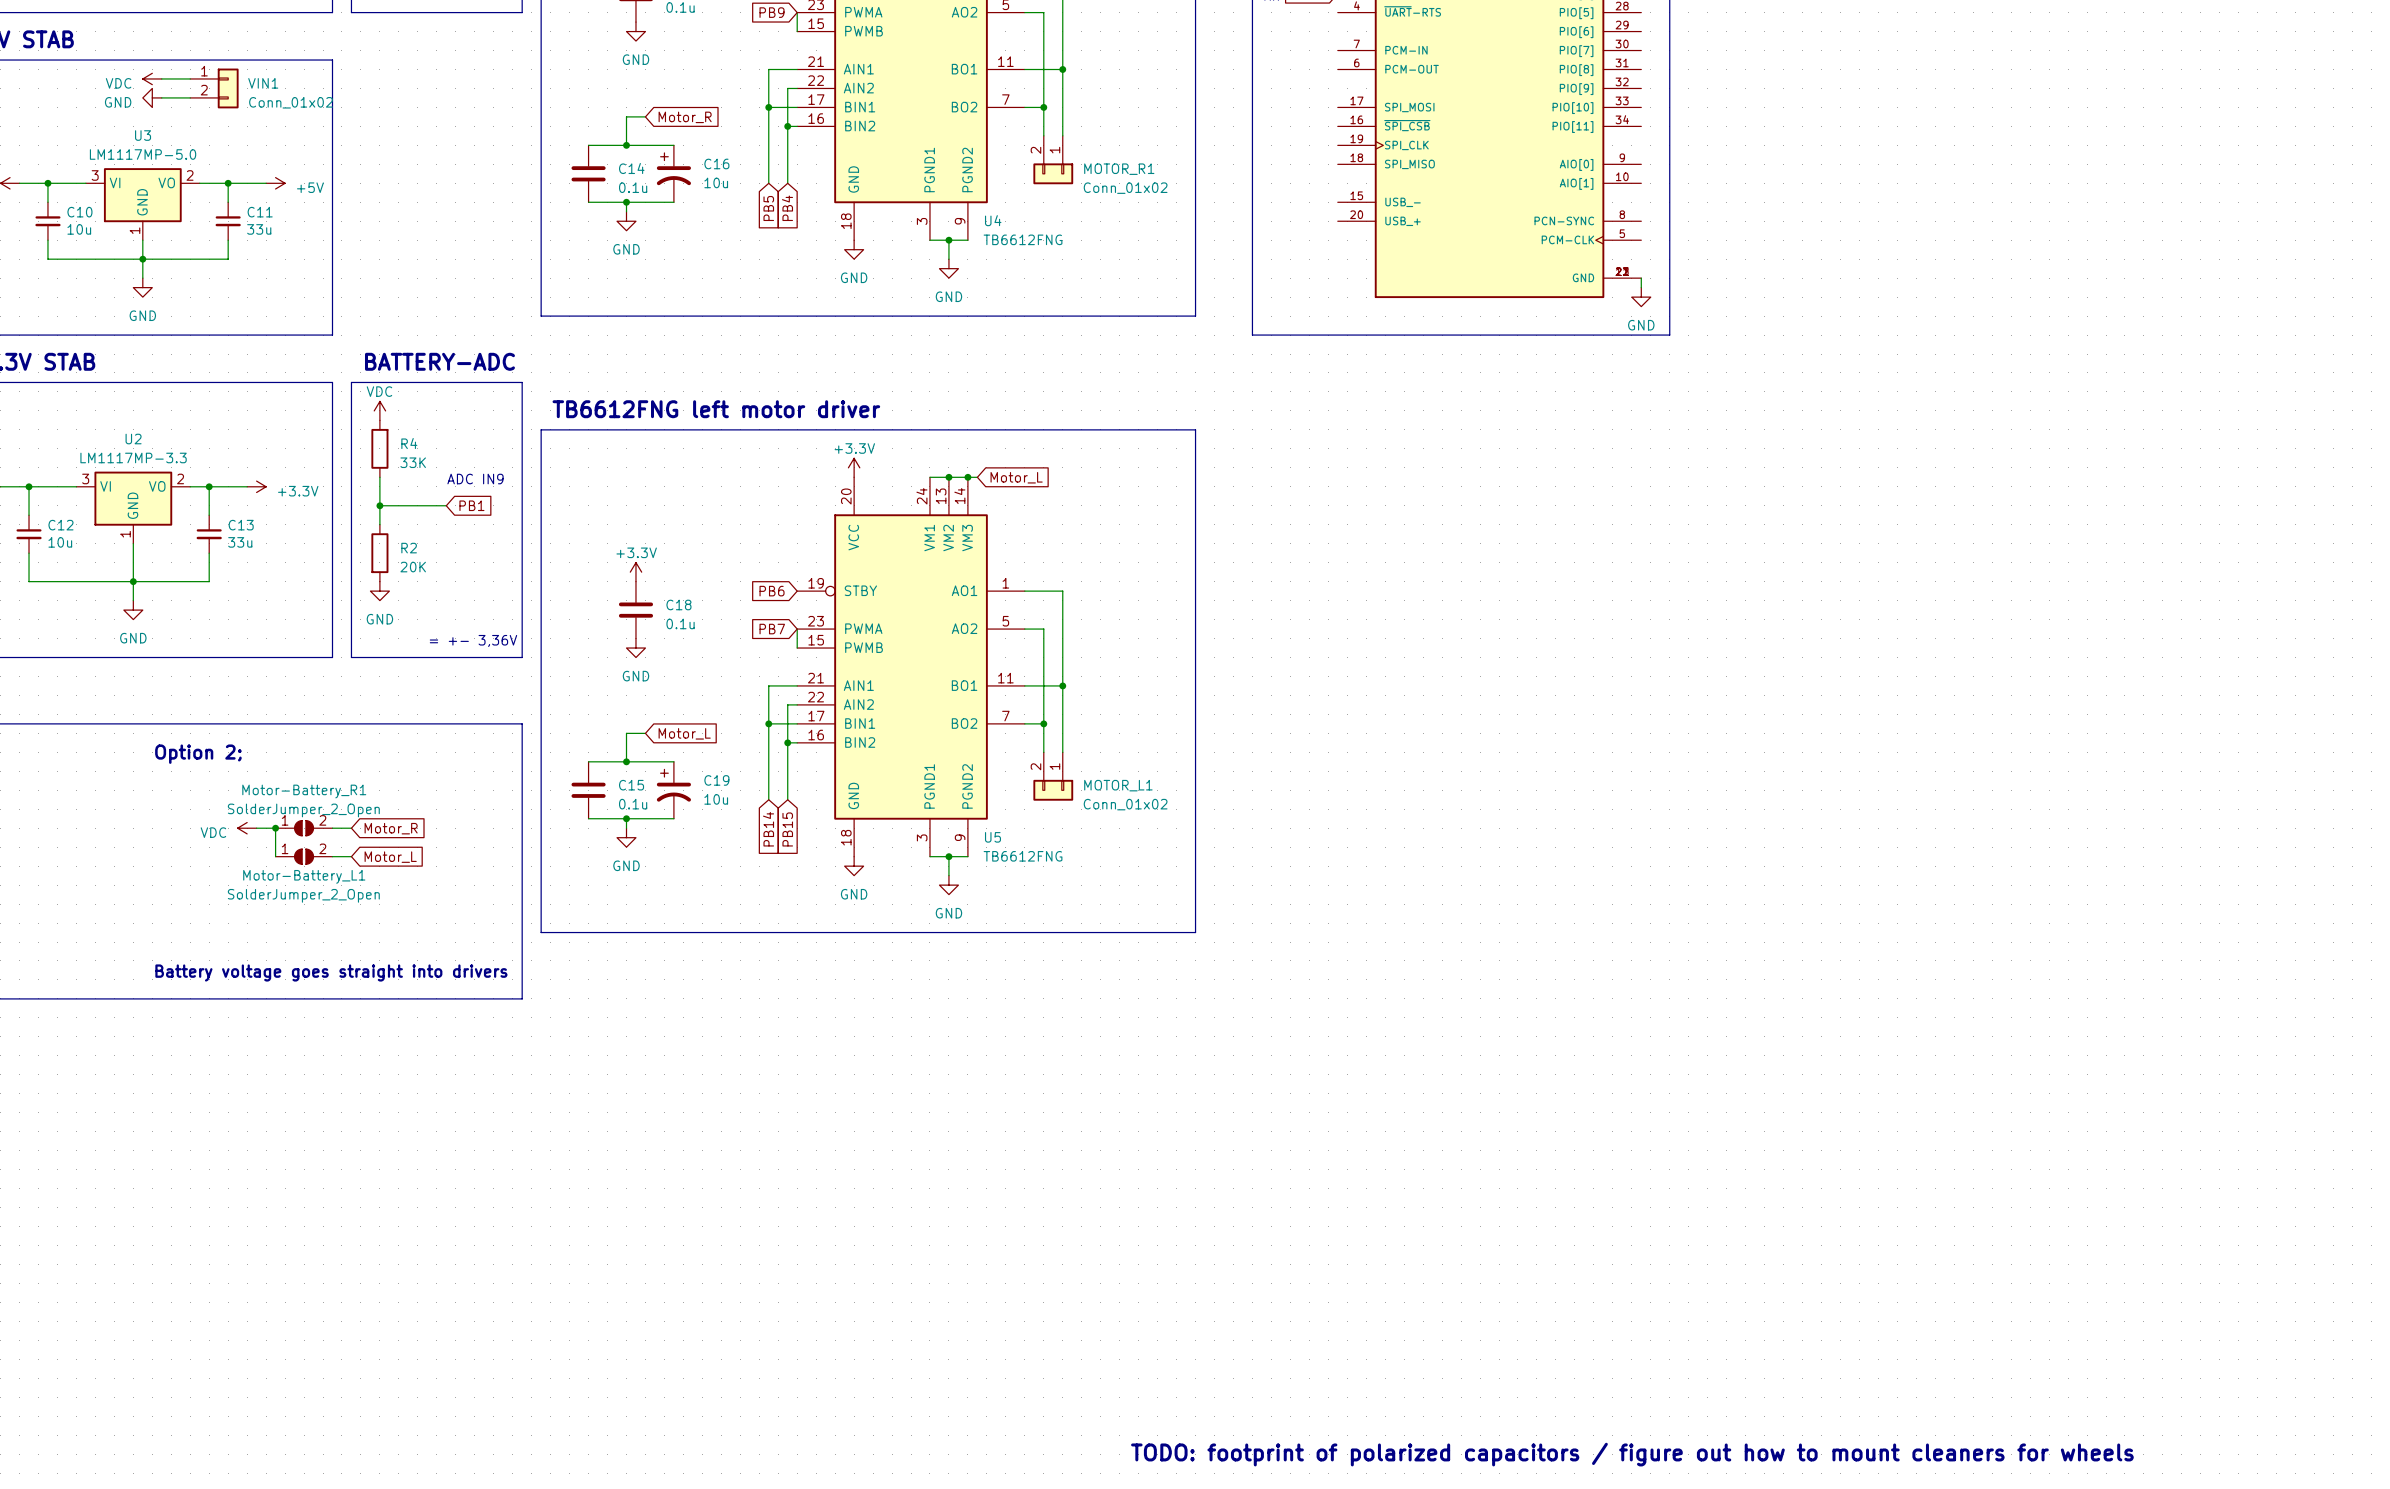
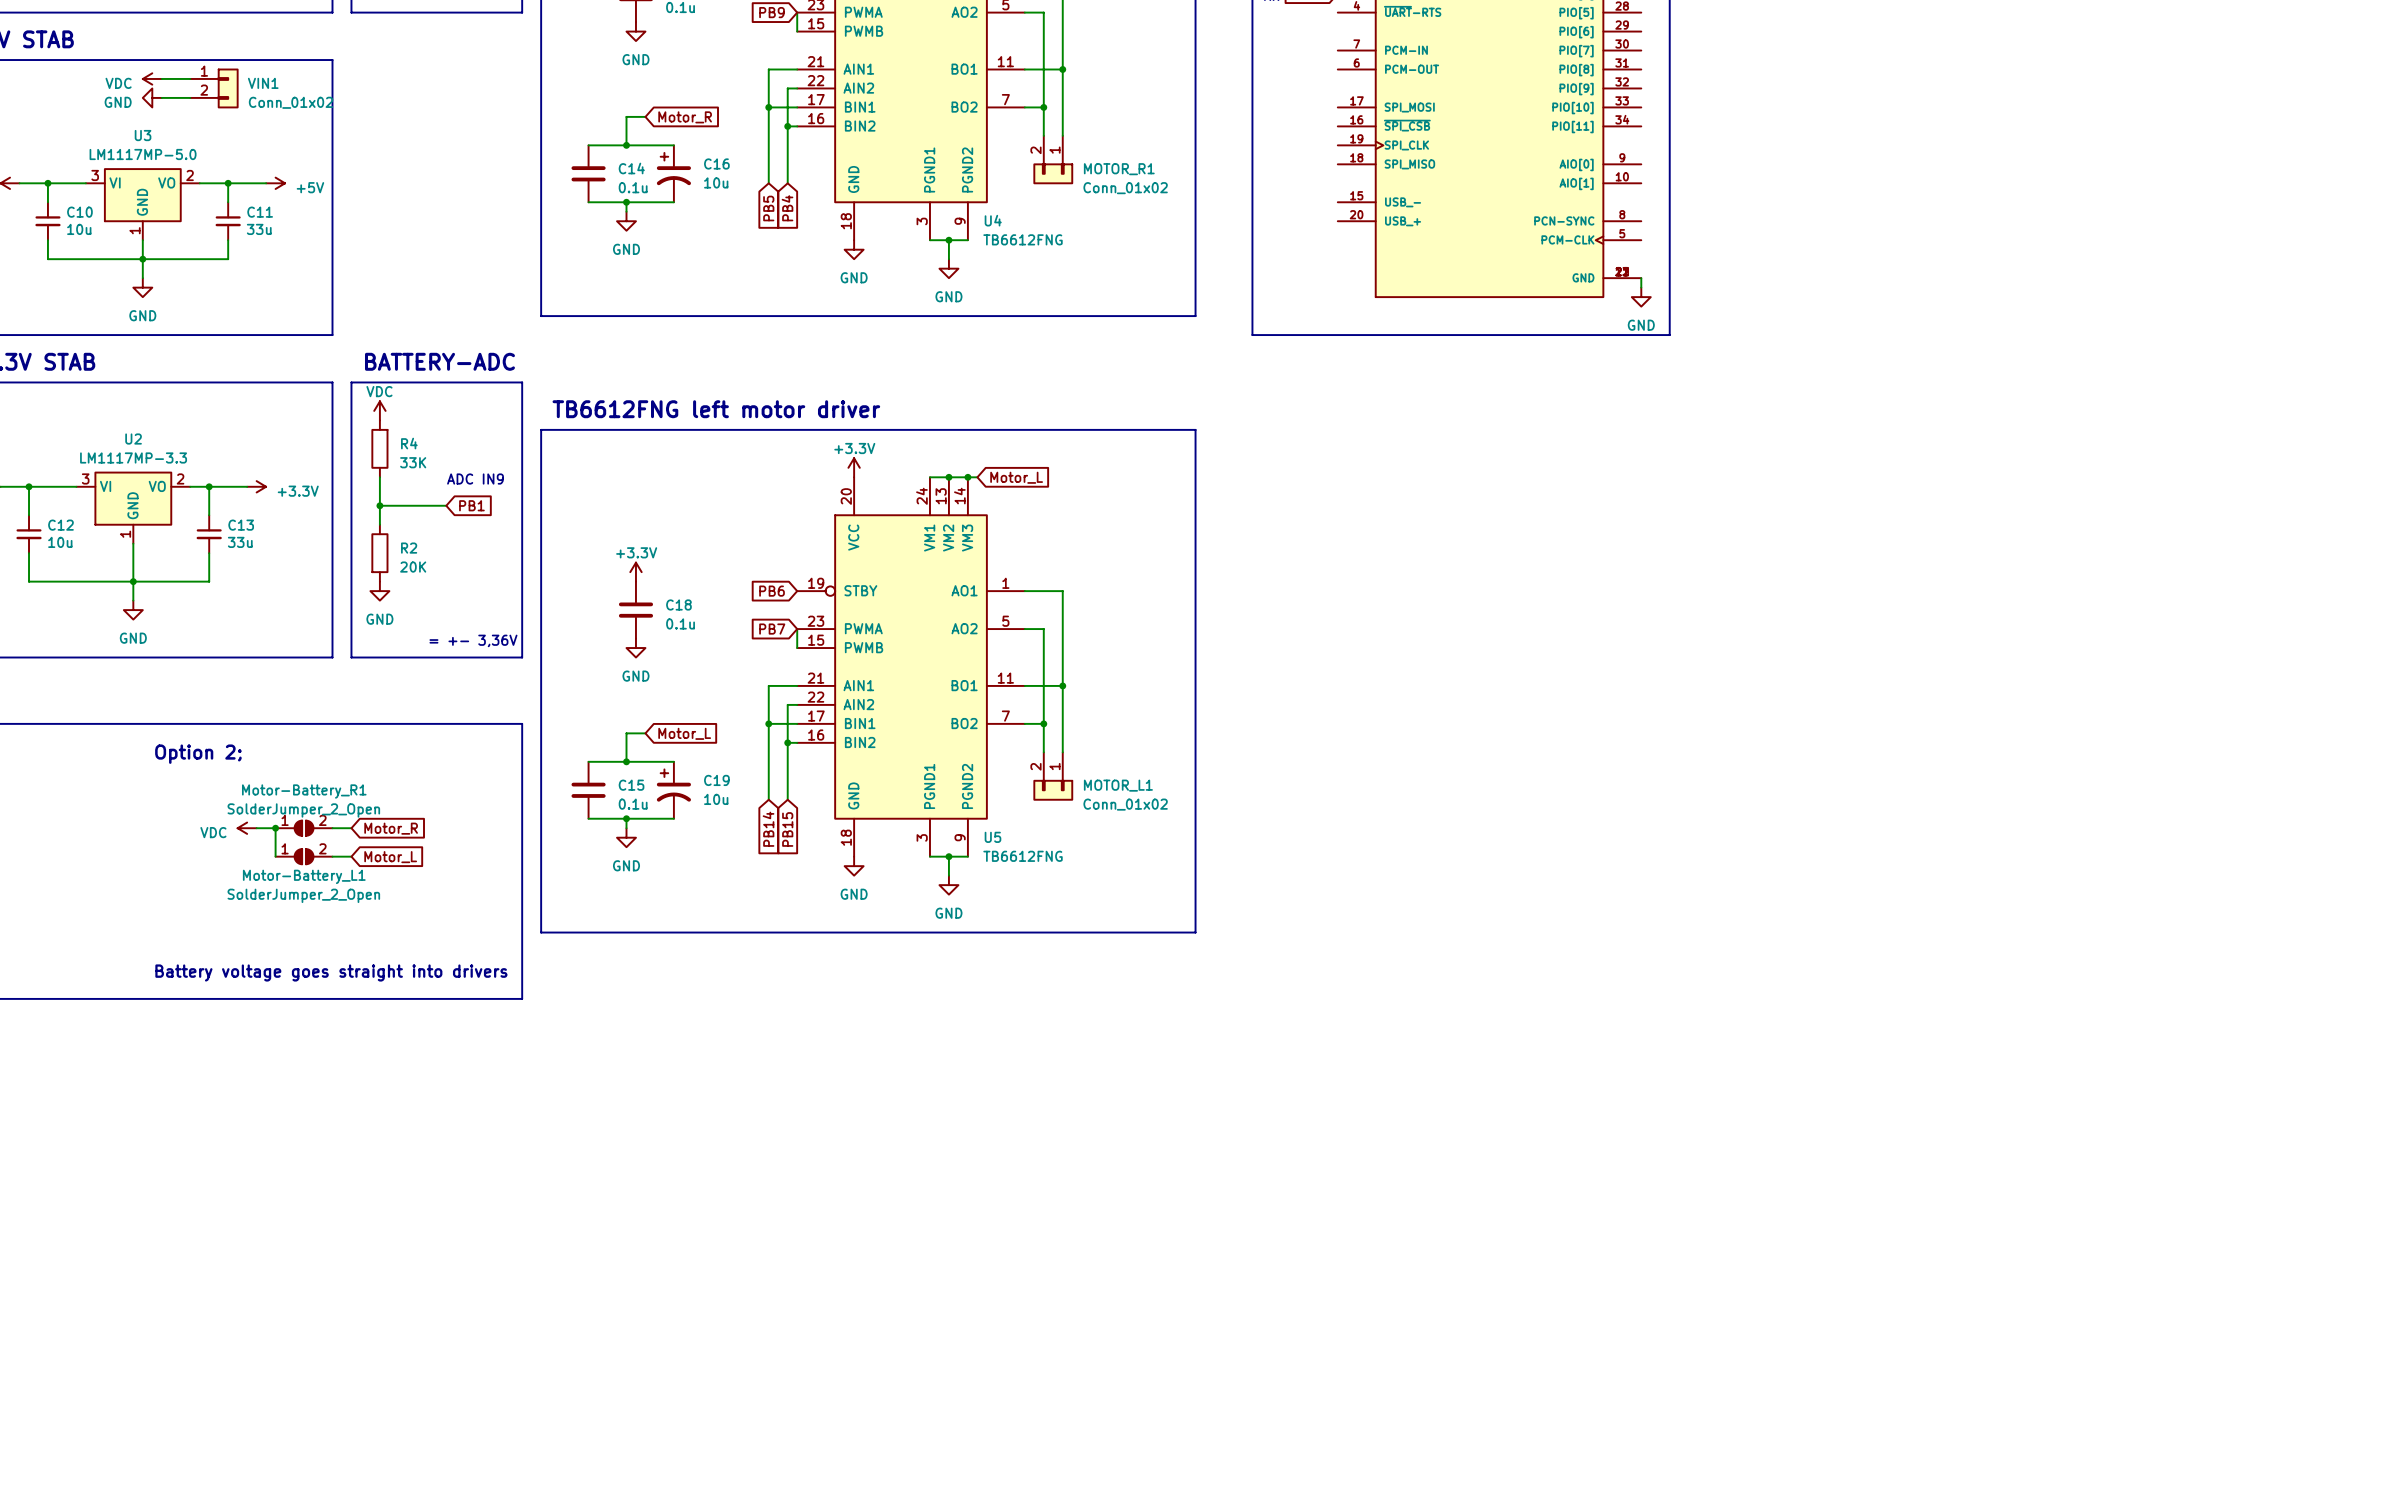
text: TODO: footprint of polarized capacitors / figure out how to mount cleaners for wheels (1632, 1454) -> none

